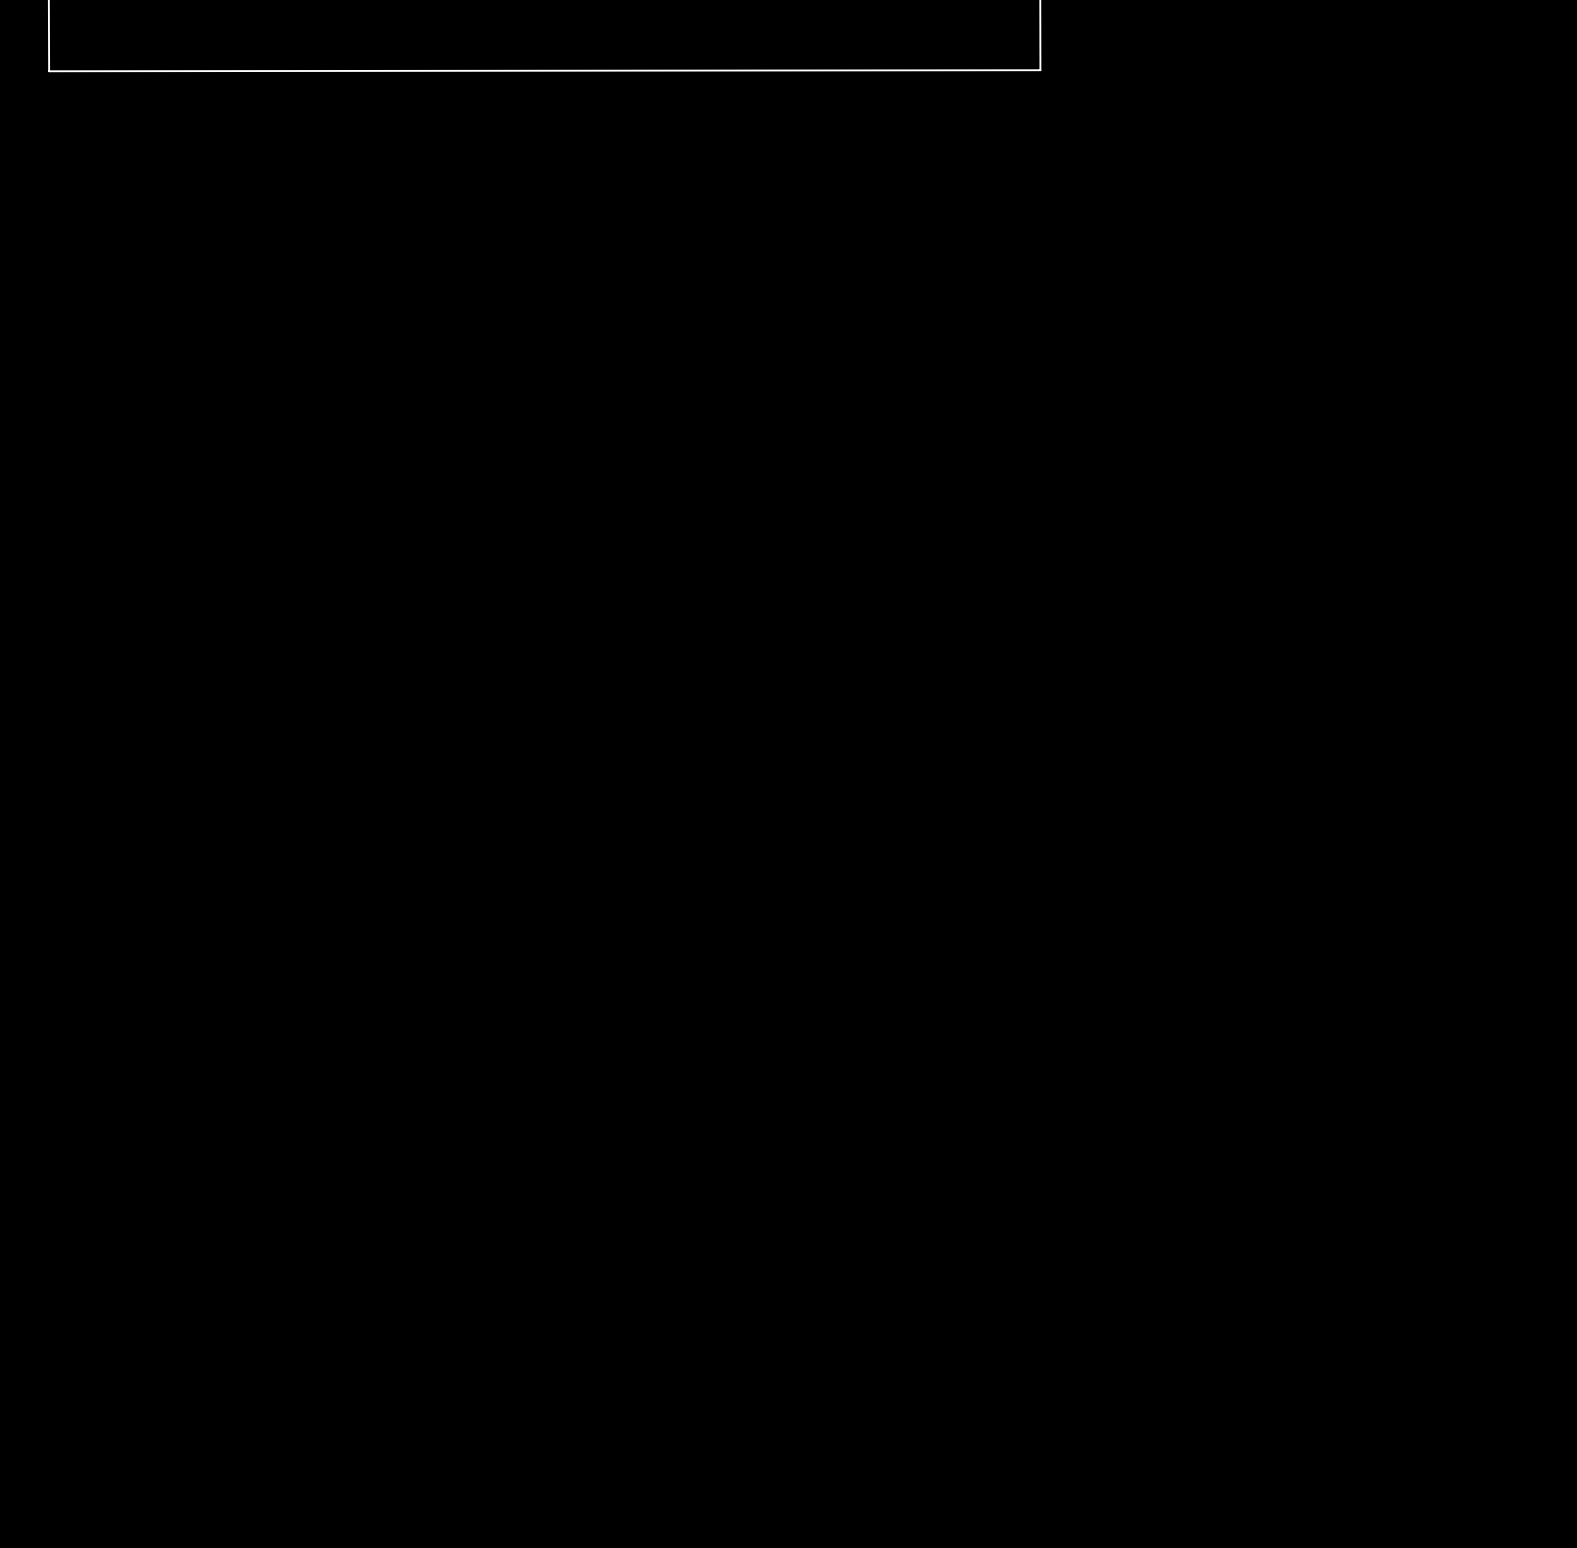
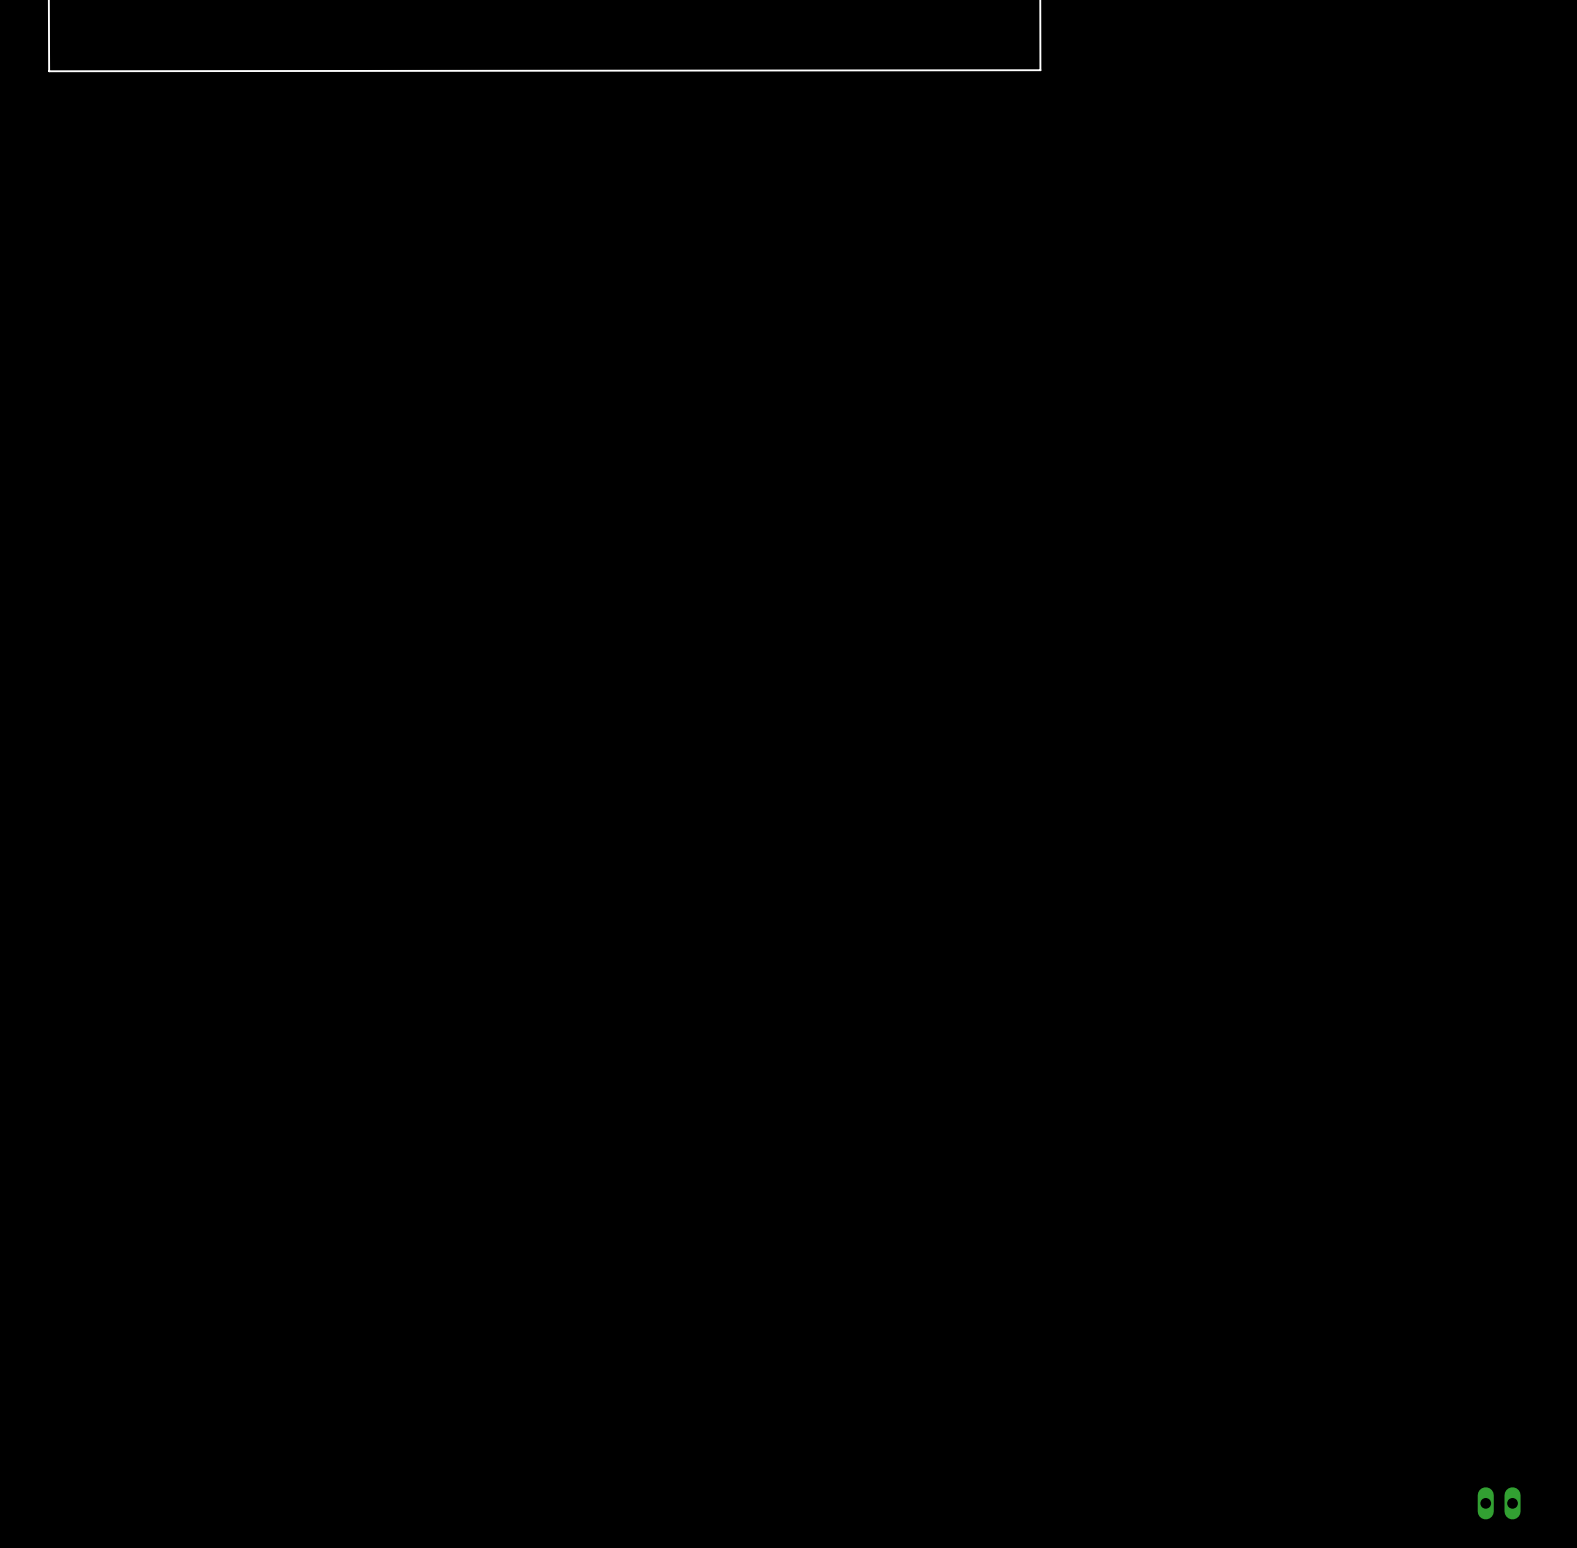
part: none -> (1499, 1503)

